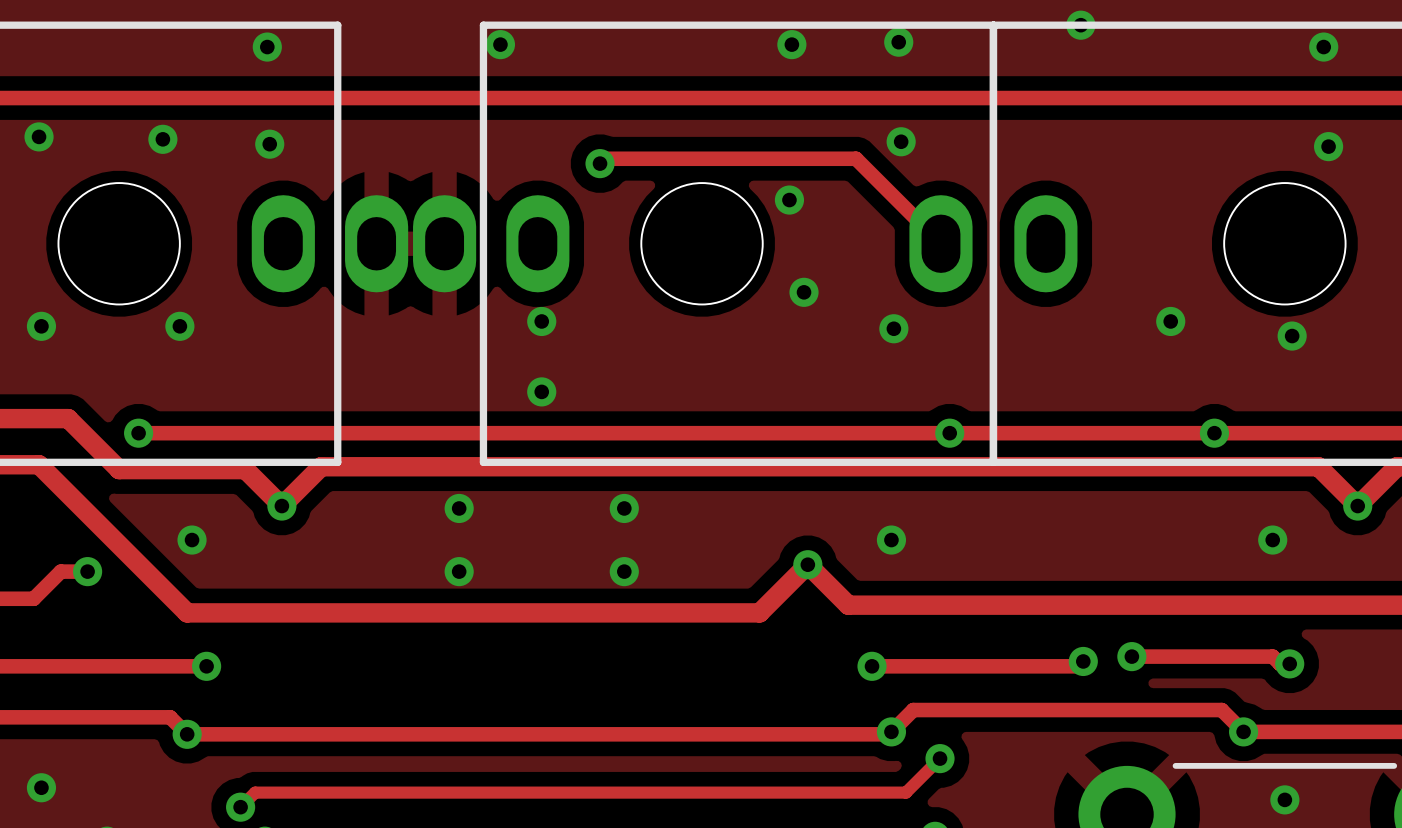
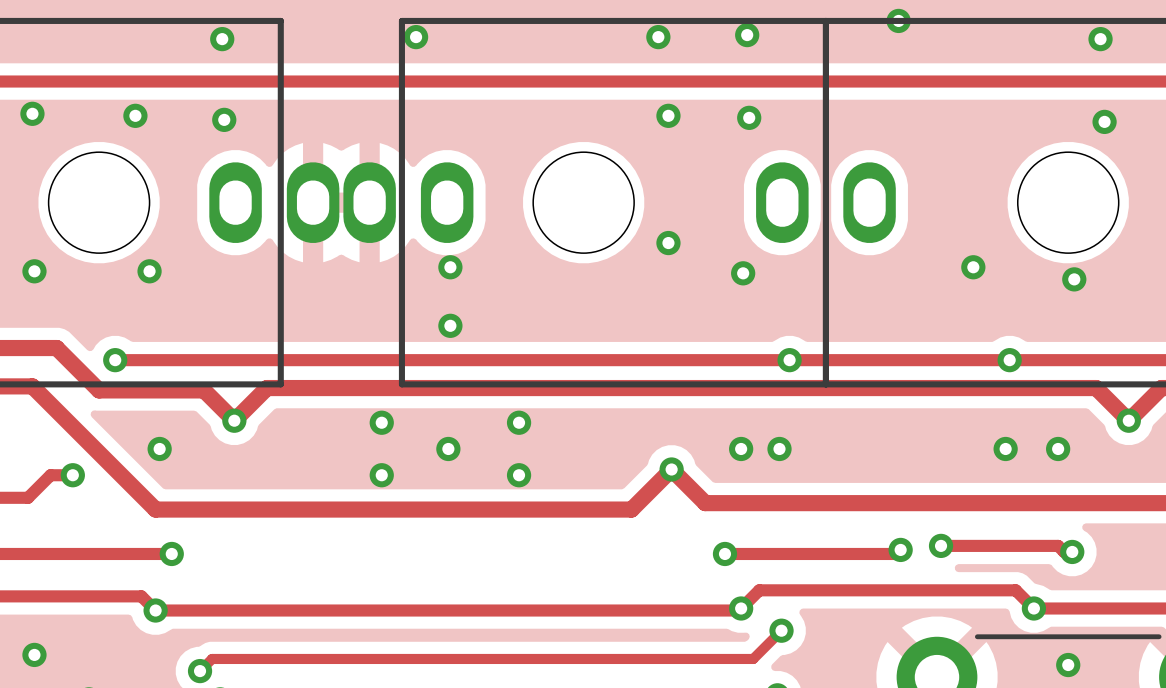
track: (600, 163) (604, 158) (855, 158) (940, 243) -> none
via: (600, 163) -> none
via position: (789, 200) -> (668, 115)
via: none -> (448, 448)
via: none -> (779, 448)
via: none -> (1005, 448)

